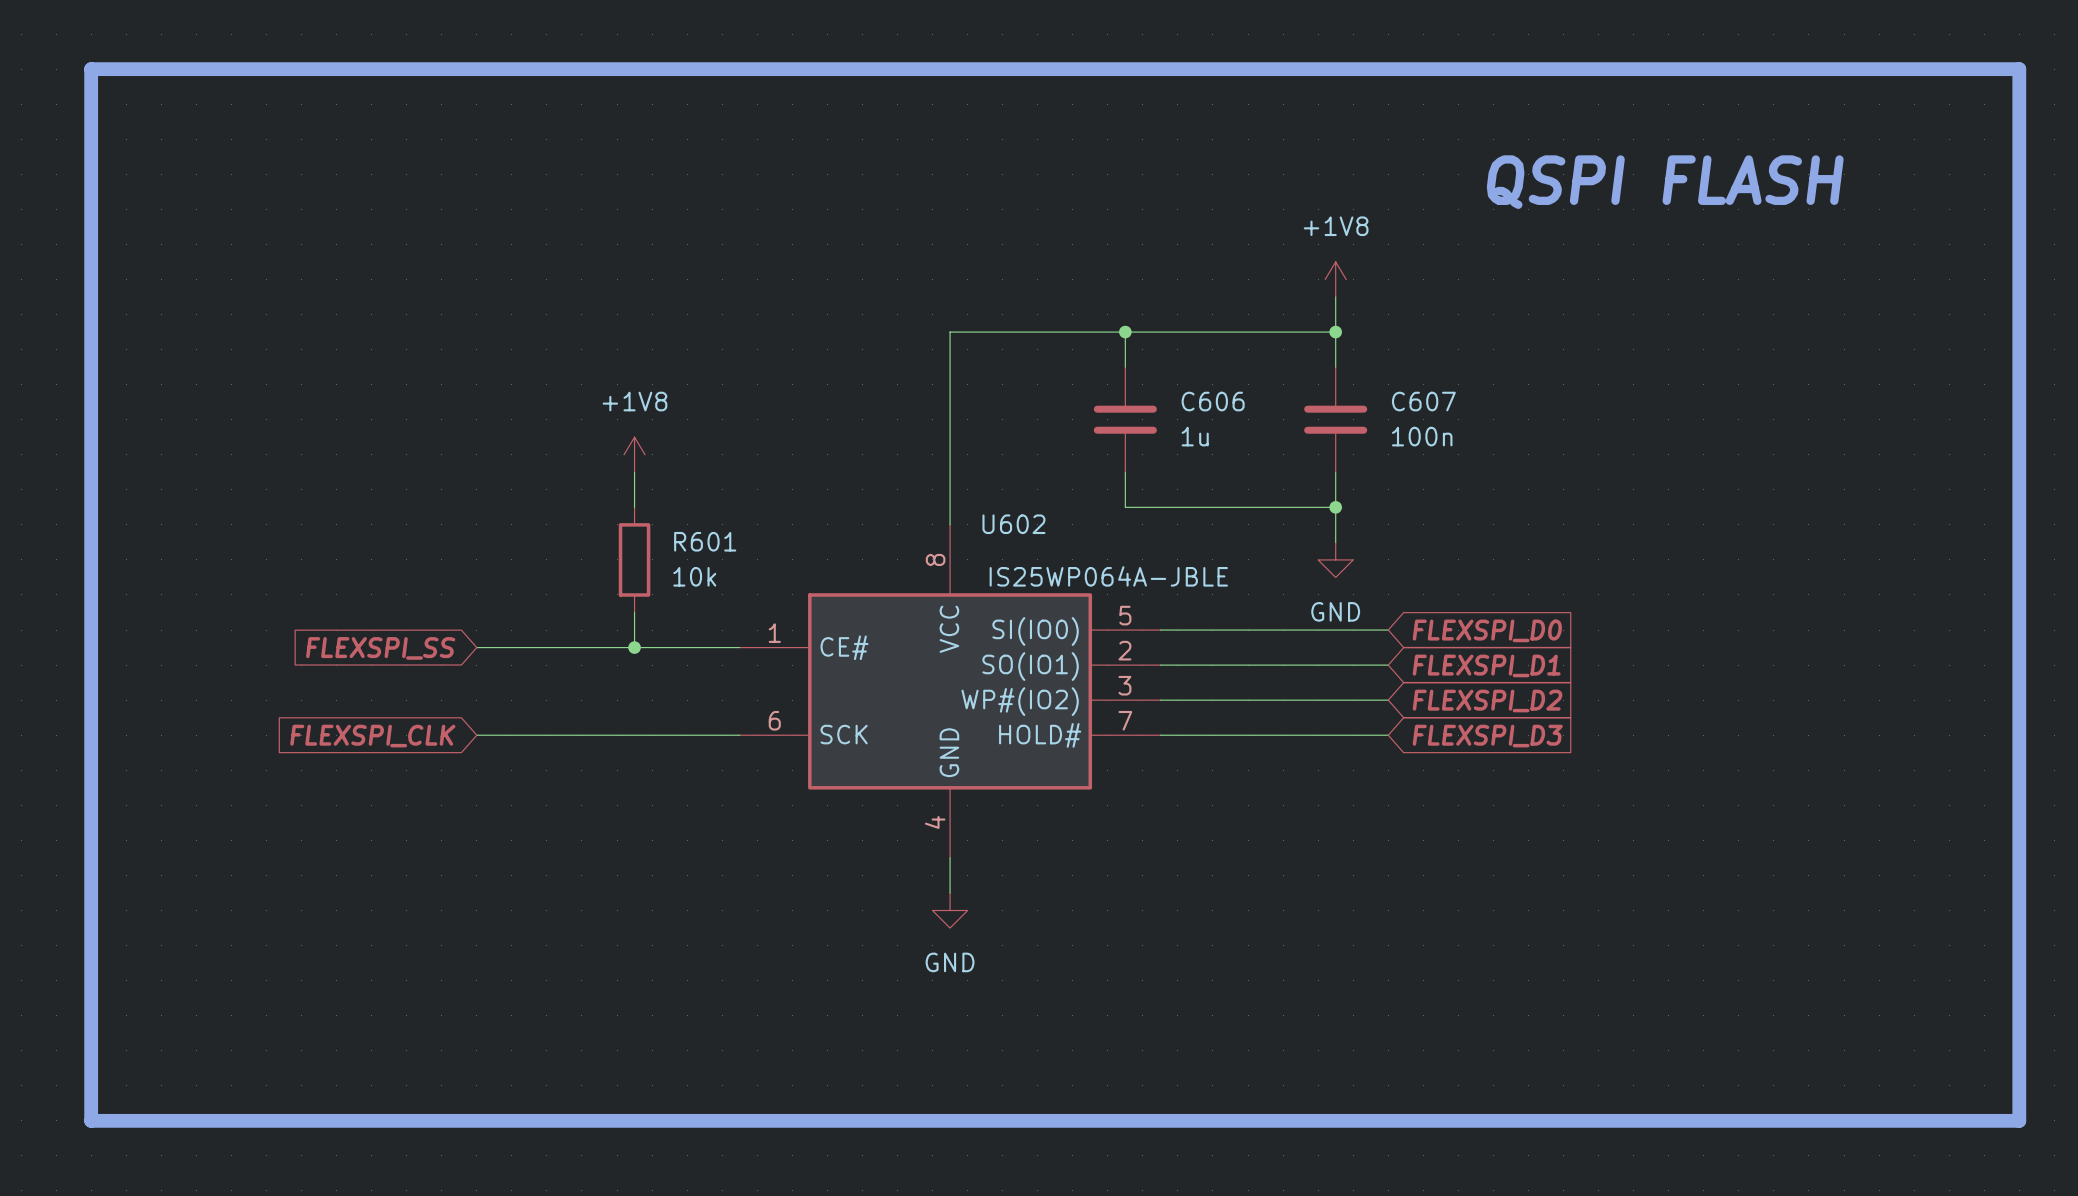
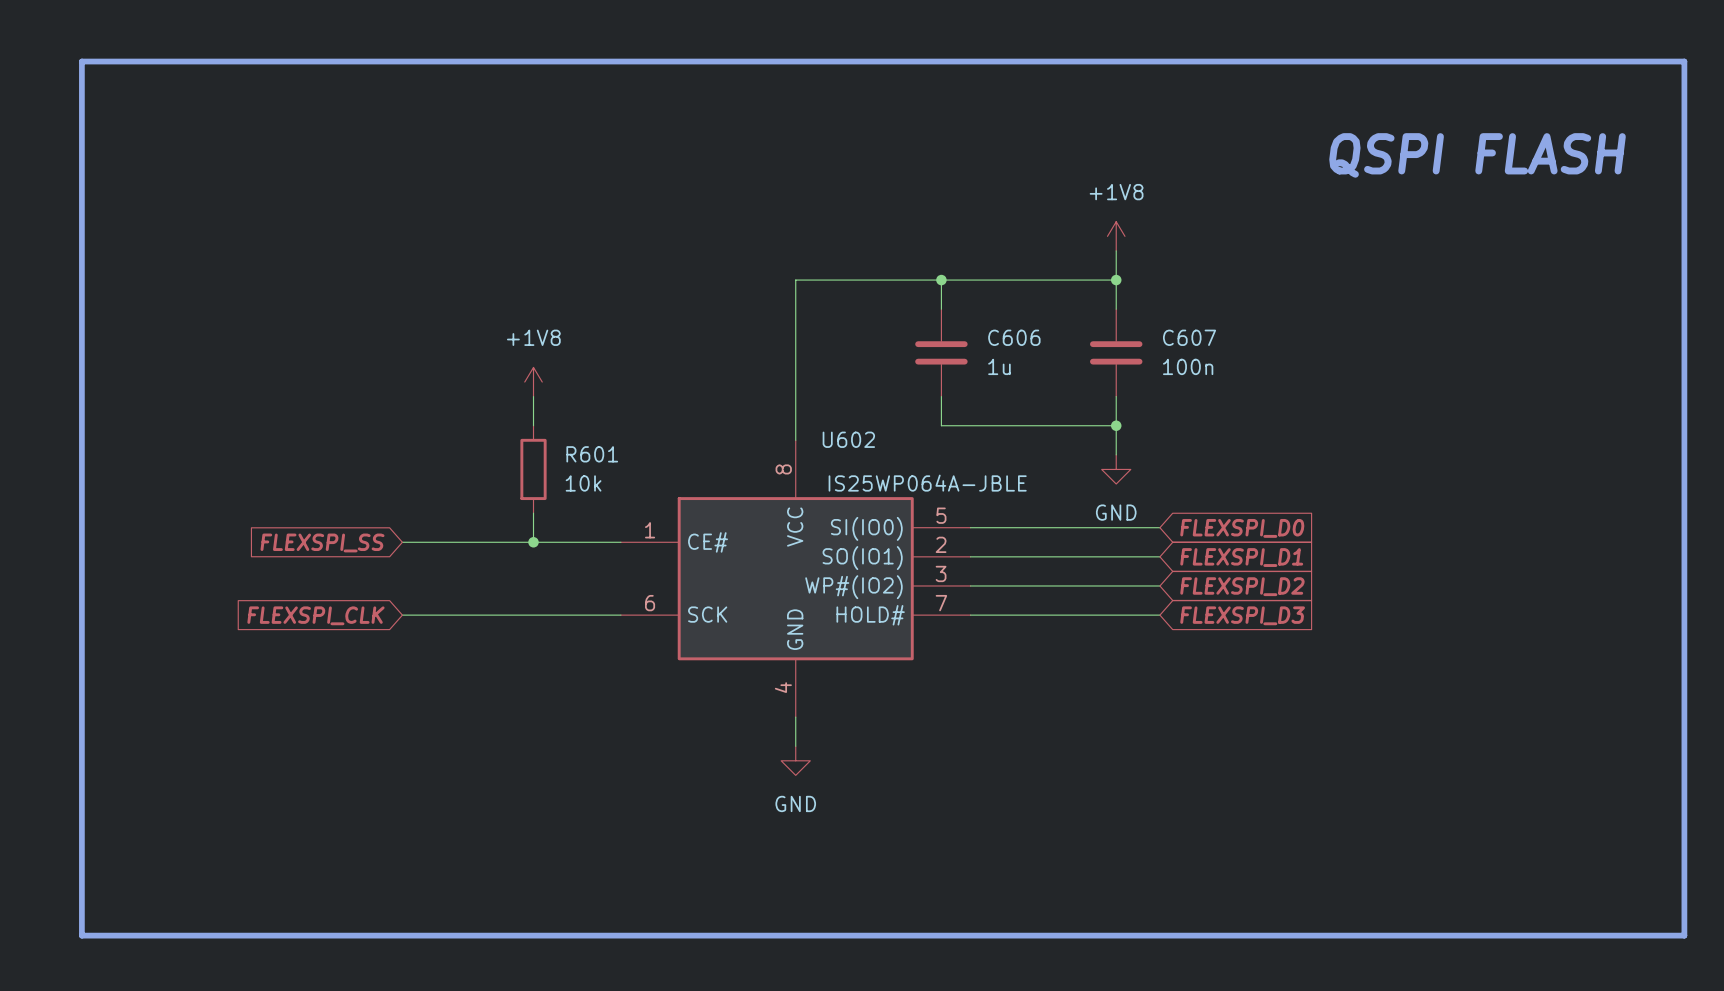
line width: thick (91, 69) (91, 1120) (2019, 1120) (2019, 69) (91, 69) -> thin (81, 61) (81, 935) (1684, 935) (1684, 61) (81, 61)
text position: QSPI FLASH (1665, 182) -> QSPI FLASH (1477, 155)

